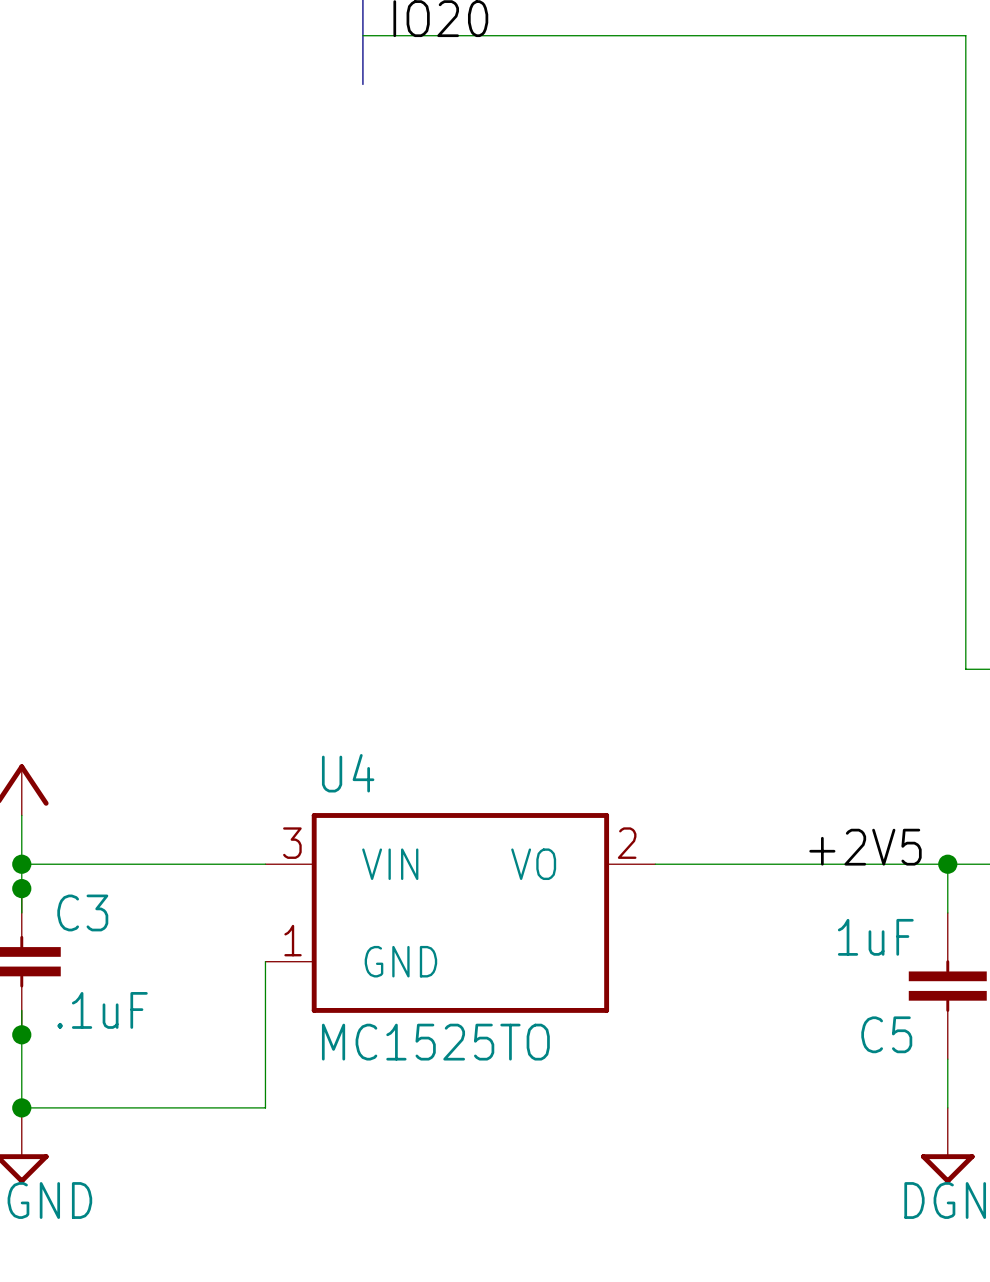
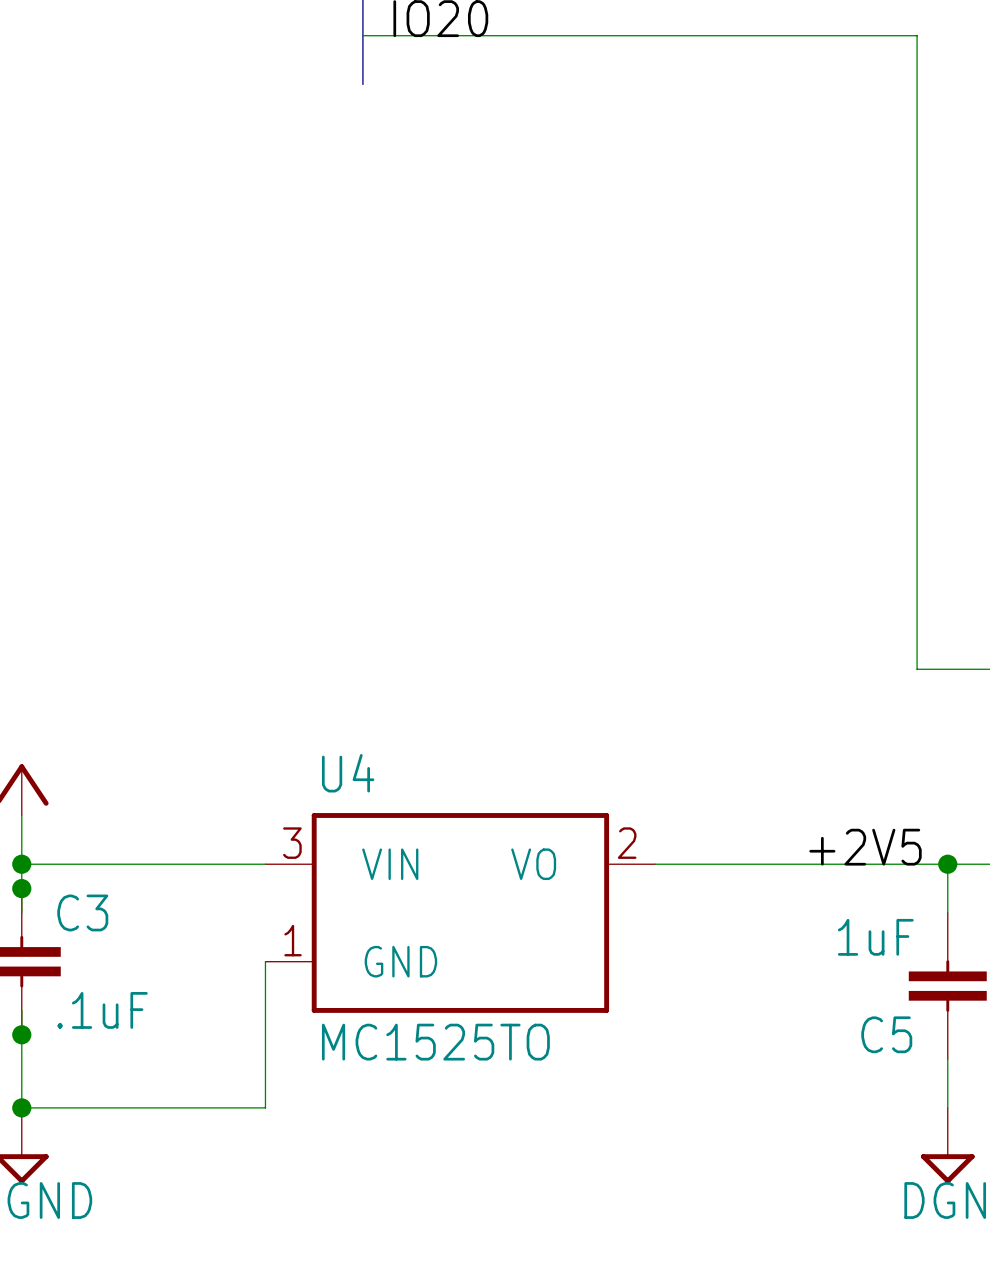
wire: (917, 35) (965, 35) (965, 669) -> (917, 35) (917, 669) (965, 669)

